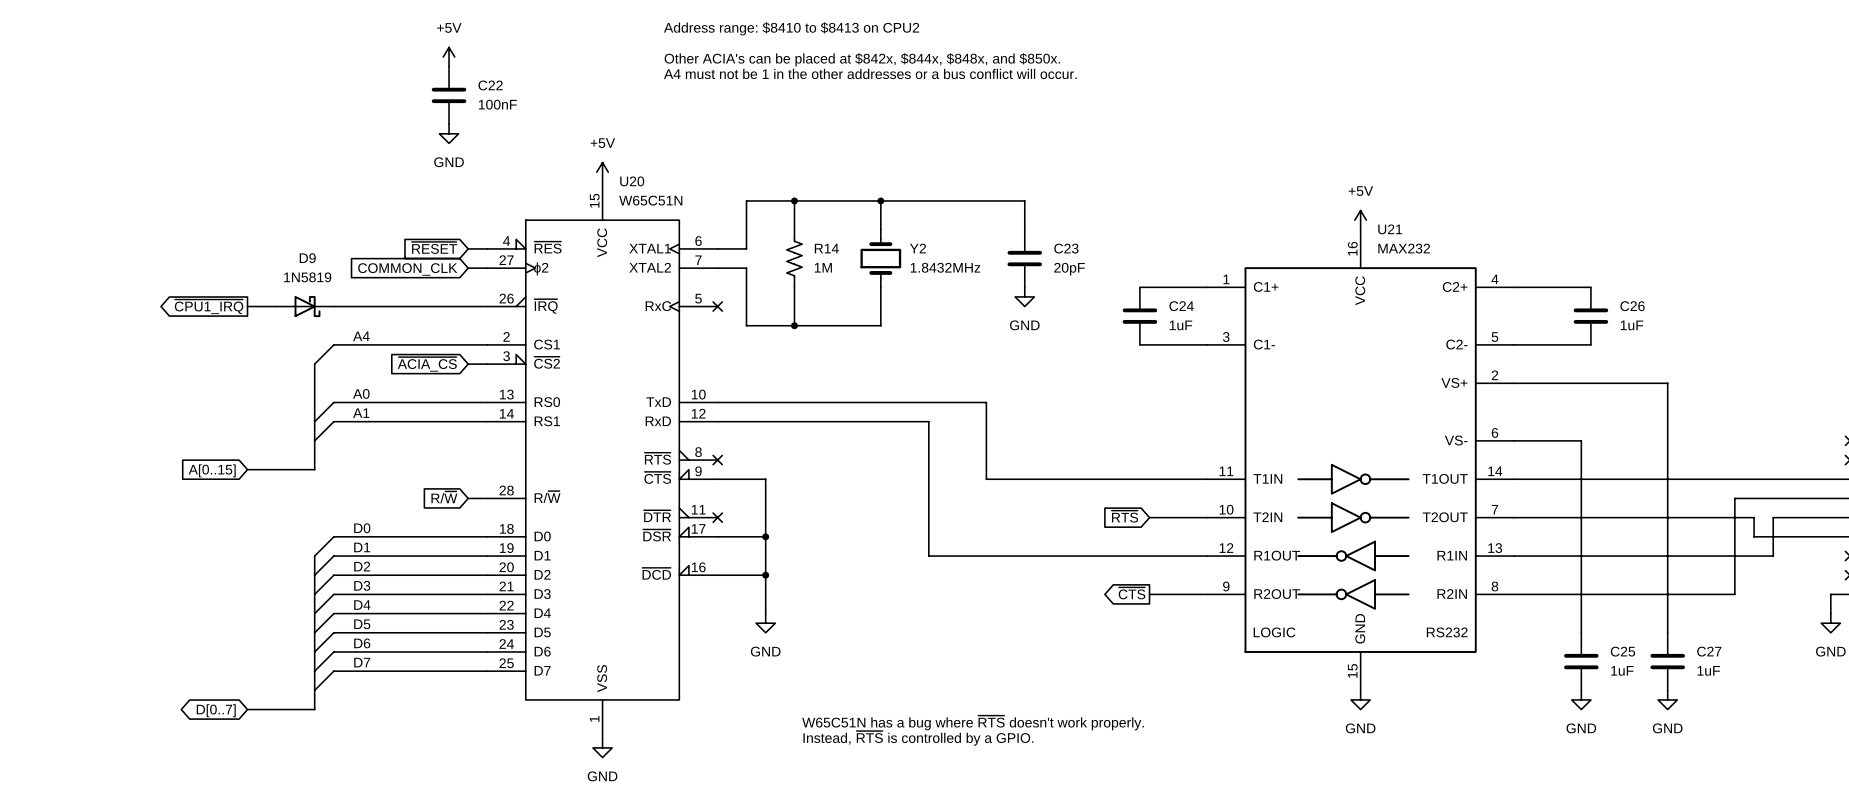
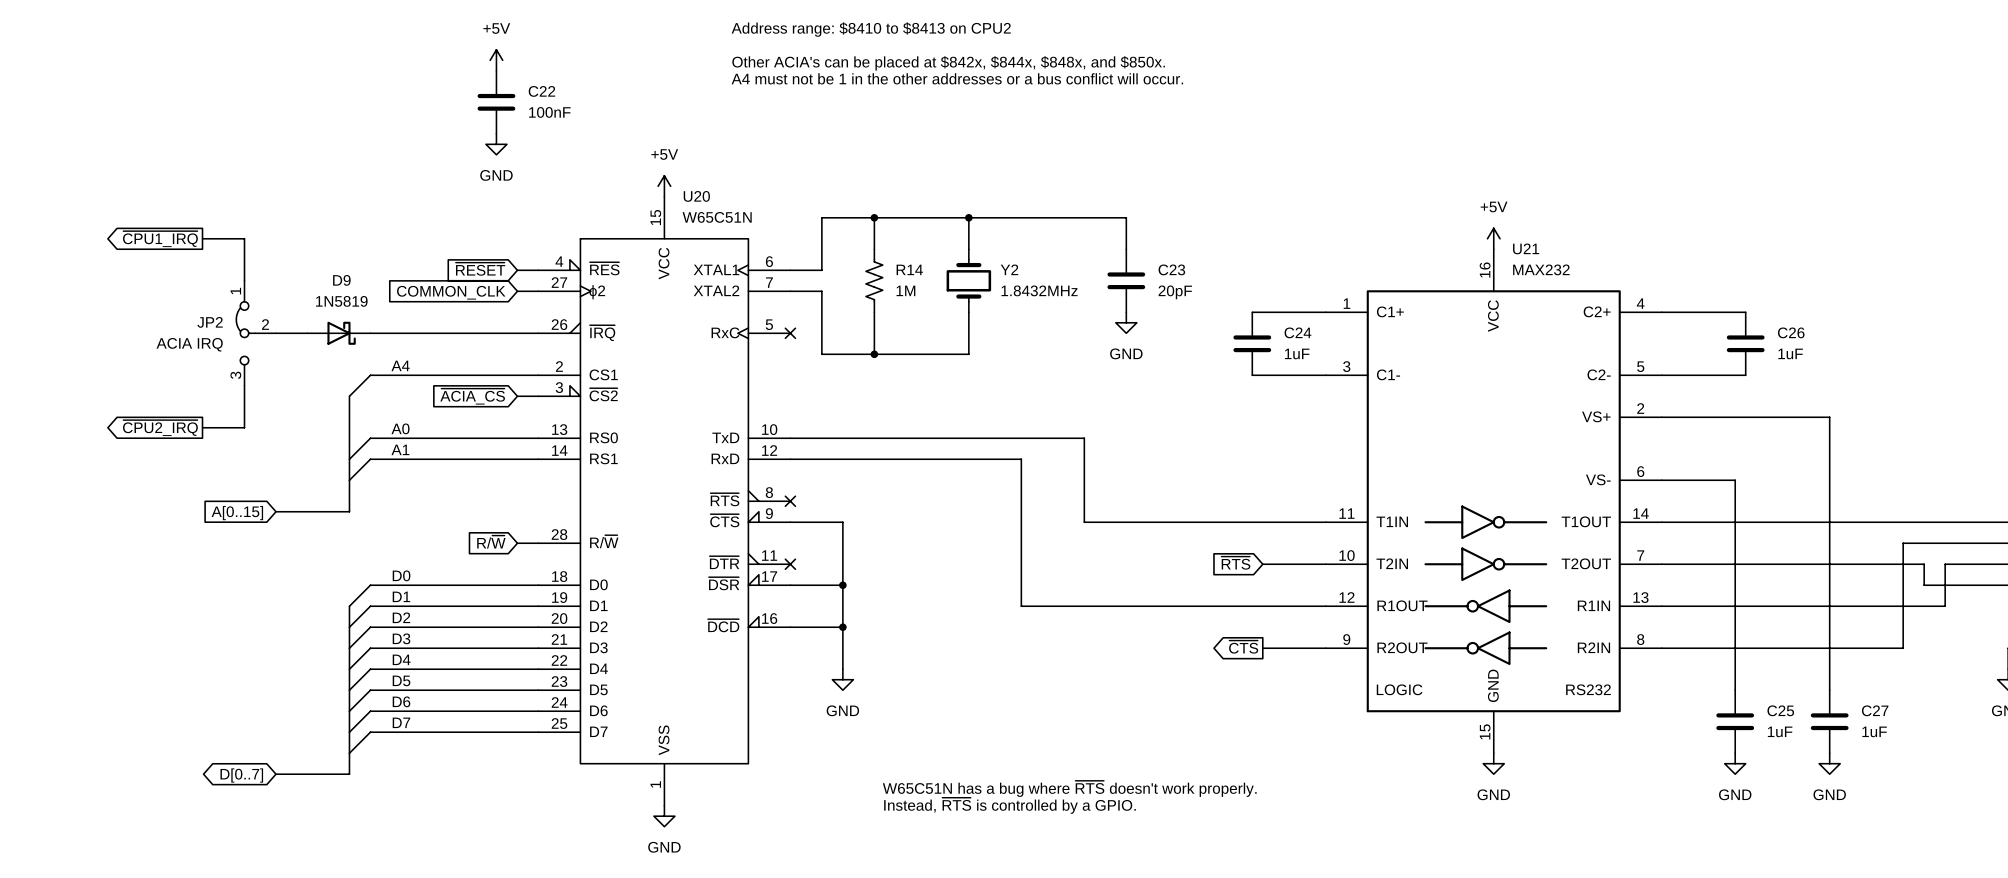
wire: none -> (202, 238) (244, 238) (244, 280)
global label position: ~{CPU1_IRQ} (209, 306) -> ~{CPU1_IRQ} (160, 239)
JP2: none -> ACIA IRQ (256, 333)
wire: none -> (244, 385) (244, 427) (202, 427)
global label: none -> ~{CPU2_IRQ} (160, 428)

